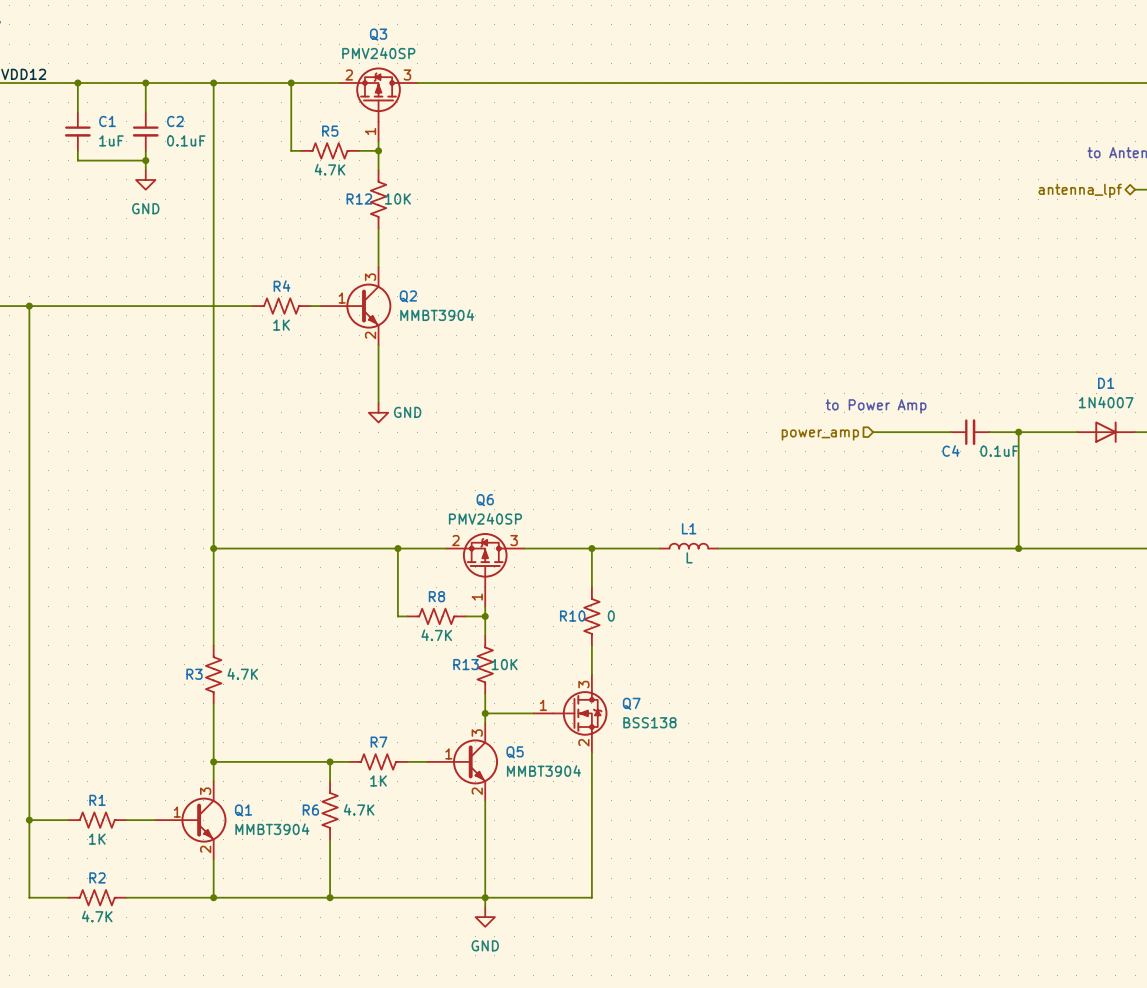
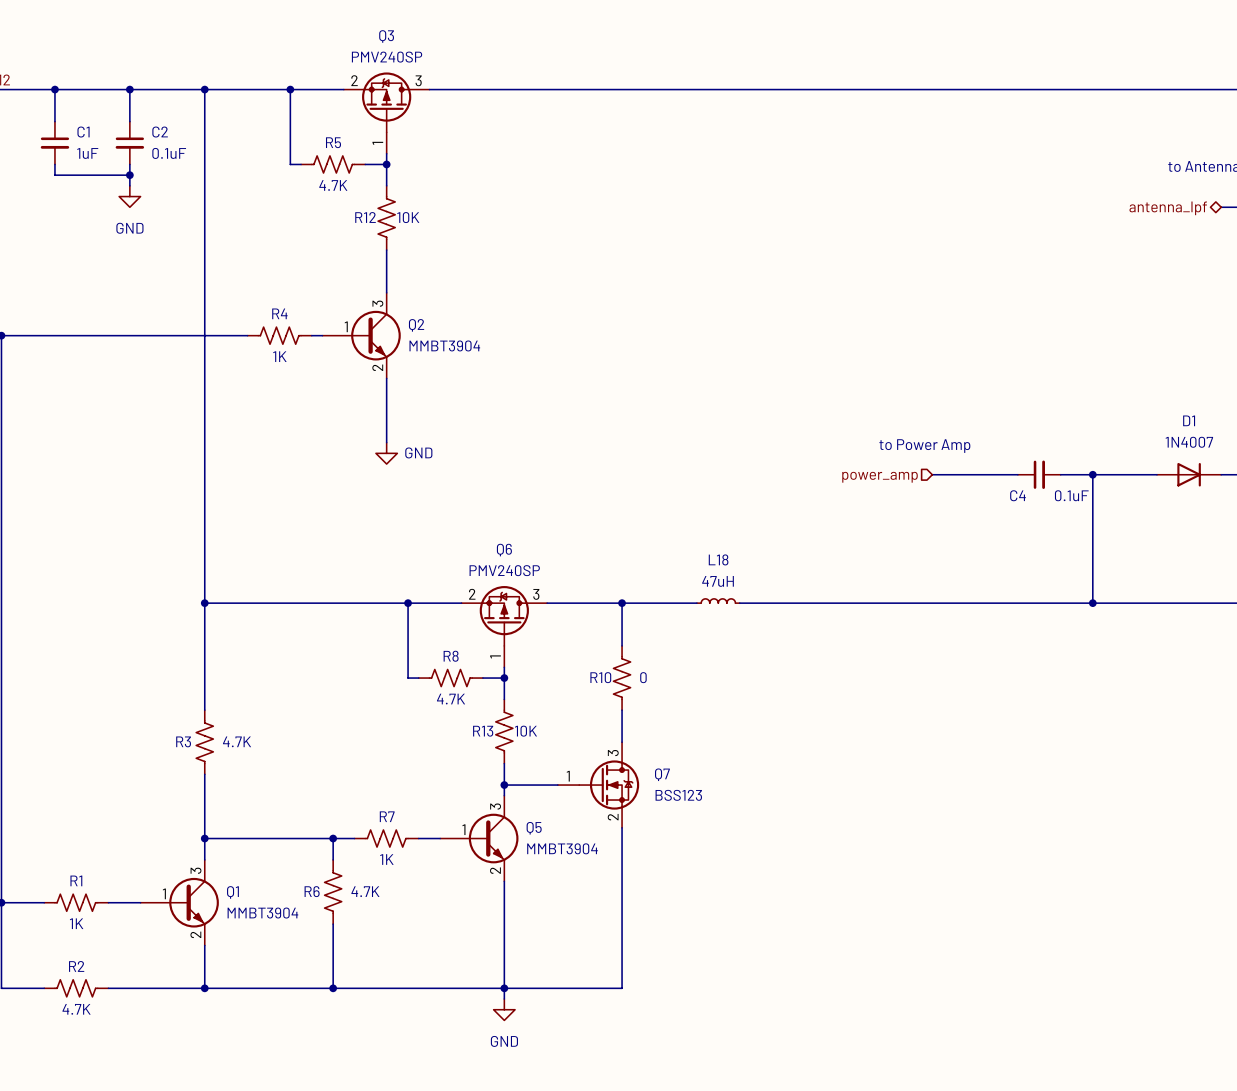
L18: none -> 47uH (718, 601)
L1: L (688, 546) -> none
Q7 value: BSS138 (649, 722) -> BSS123 (678, 795)

